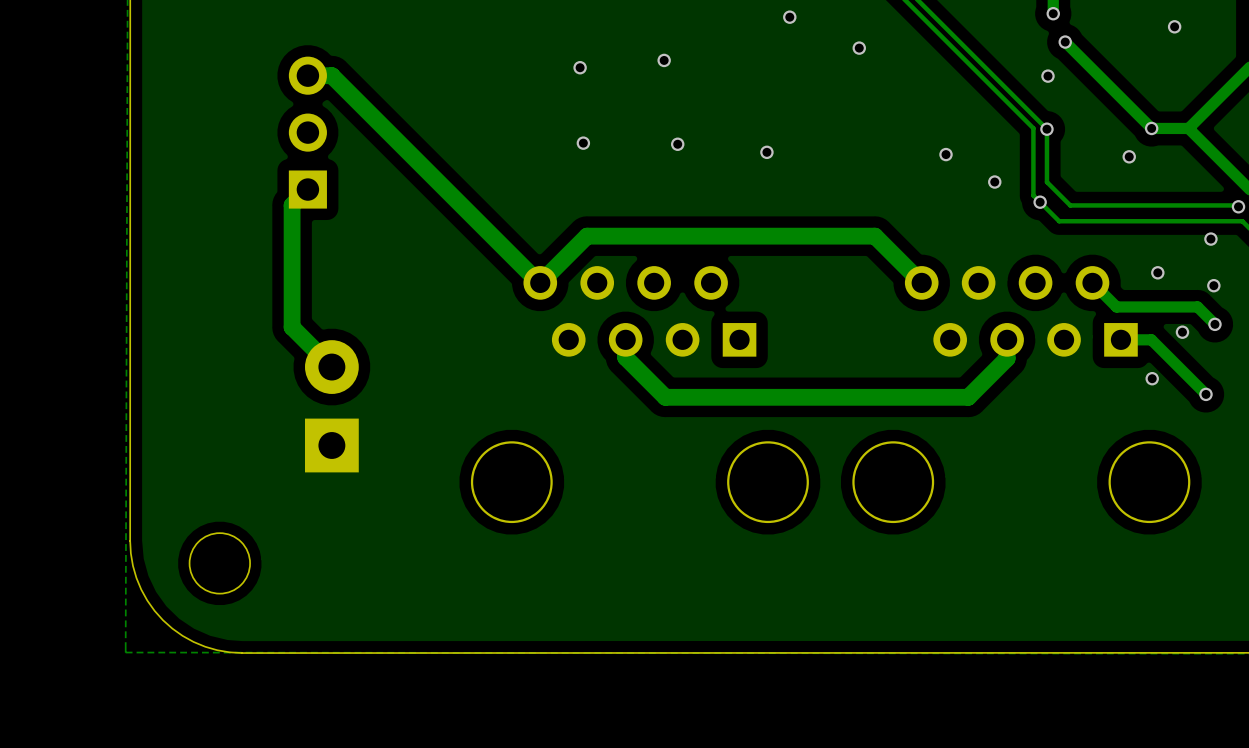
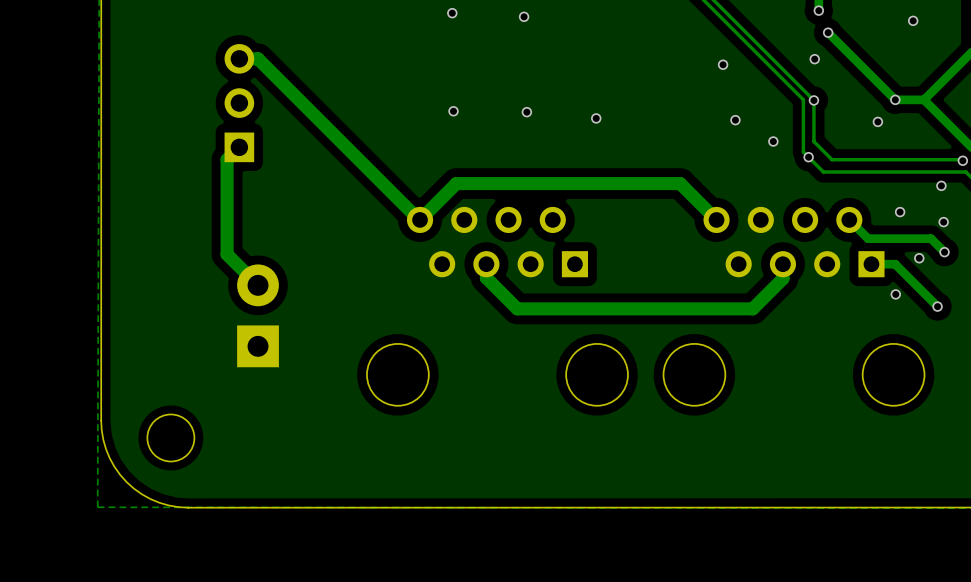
via: none -> (452, 13)
via: (789, 17) -> none
via: (859, 48) -> none
via position: (664, 60) -> (524, 16)
via: (580, 67) -> none
via: none -> (723, 64)

